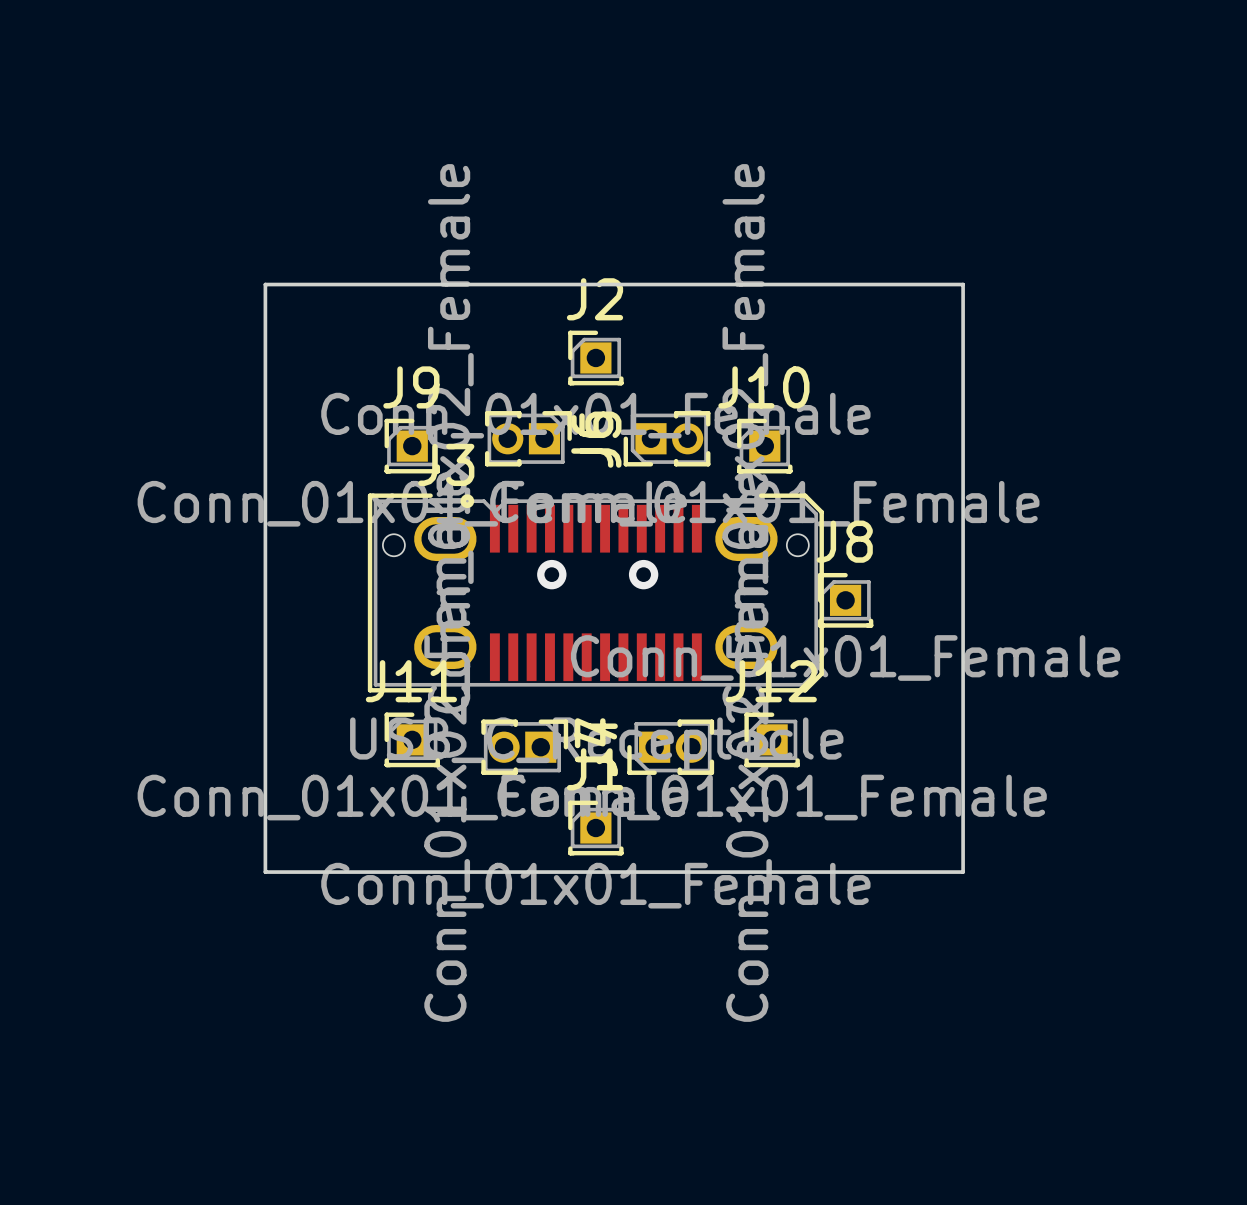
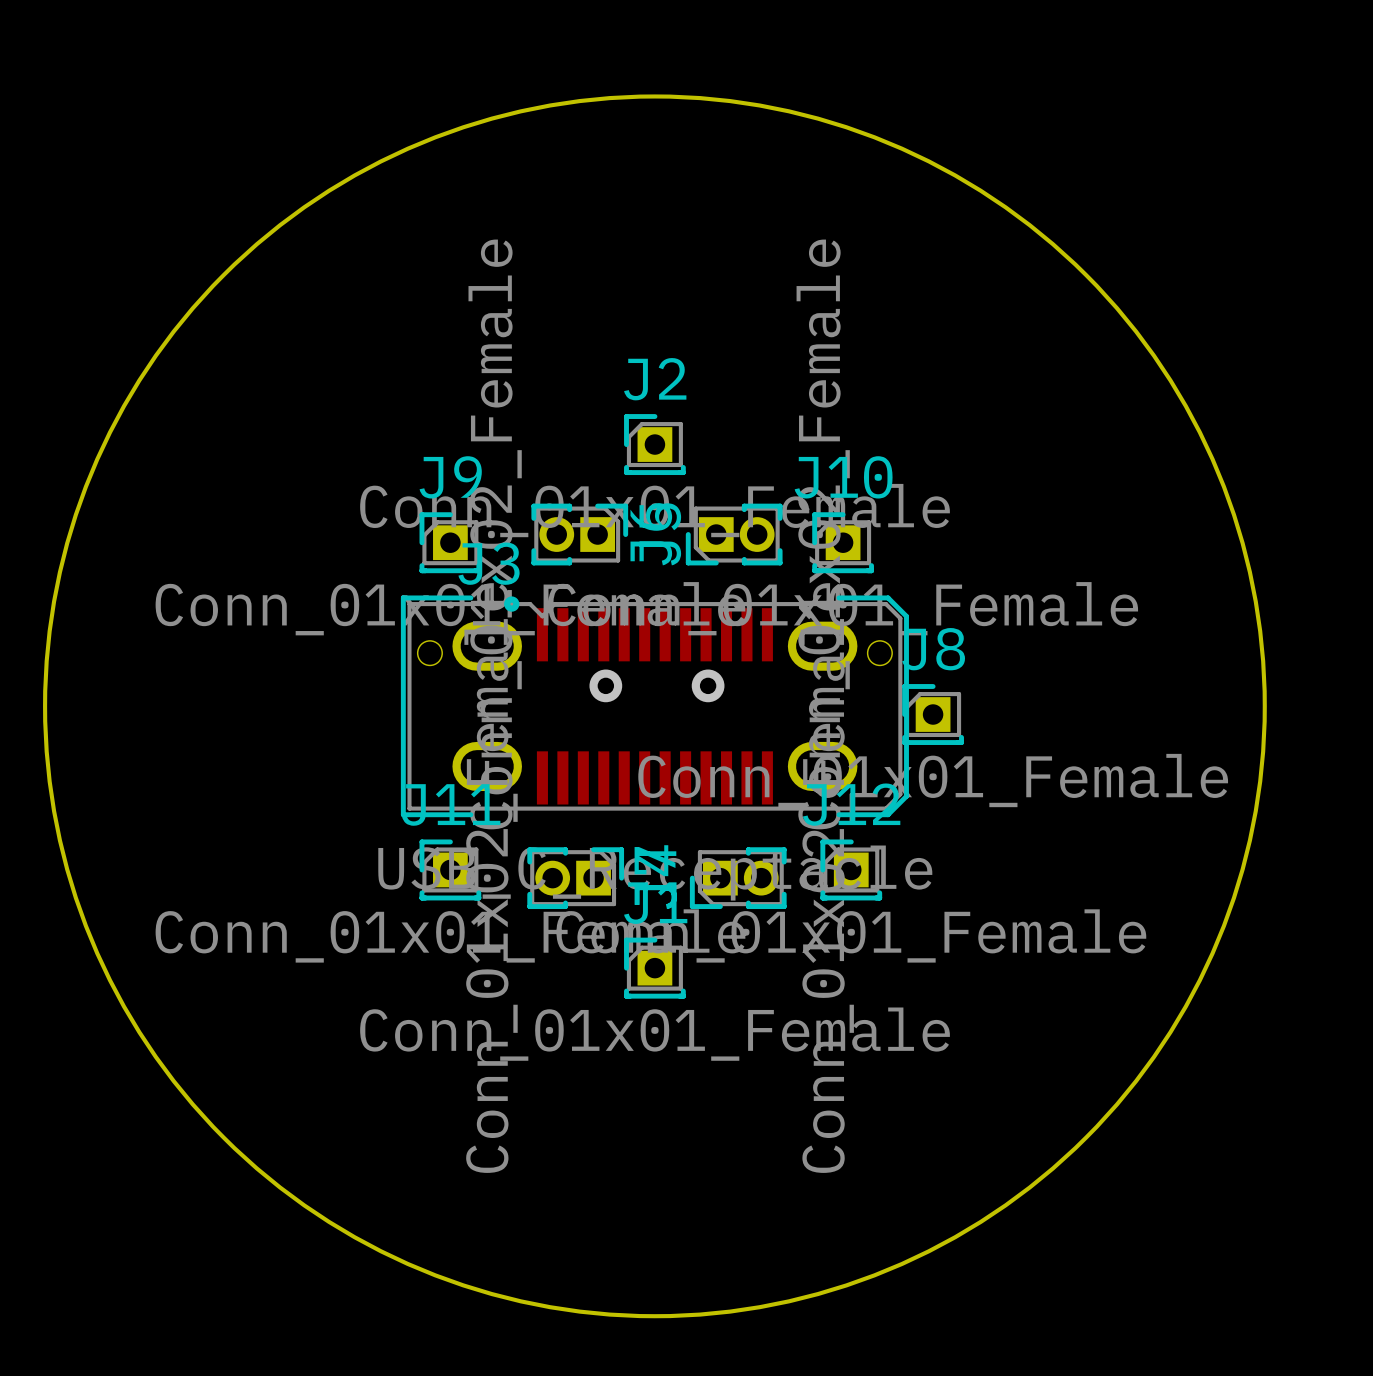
round board edge: none -> [43, 94, 1267, 1319]
board edge: (265, 284) (963, 284) (963, 872) (265, 872) (265, 284) -> none

